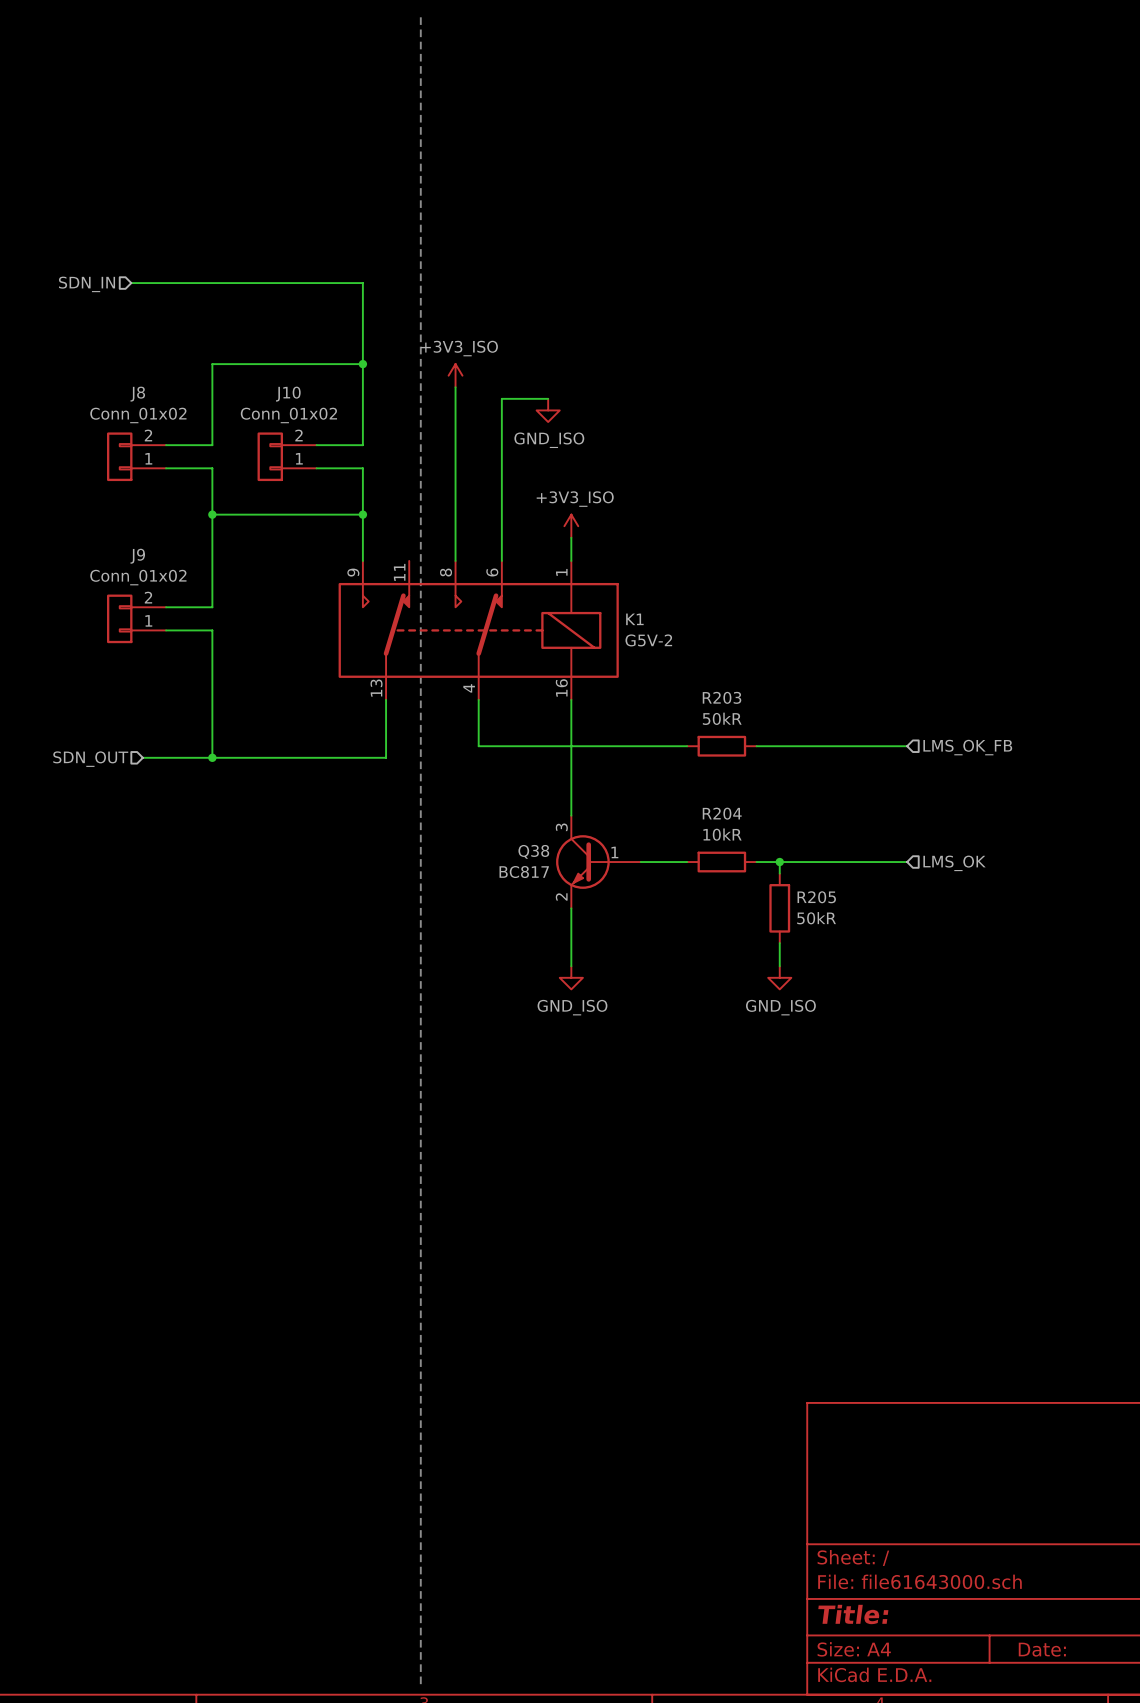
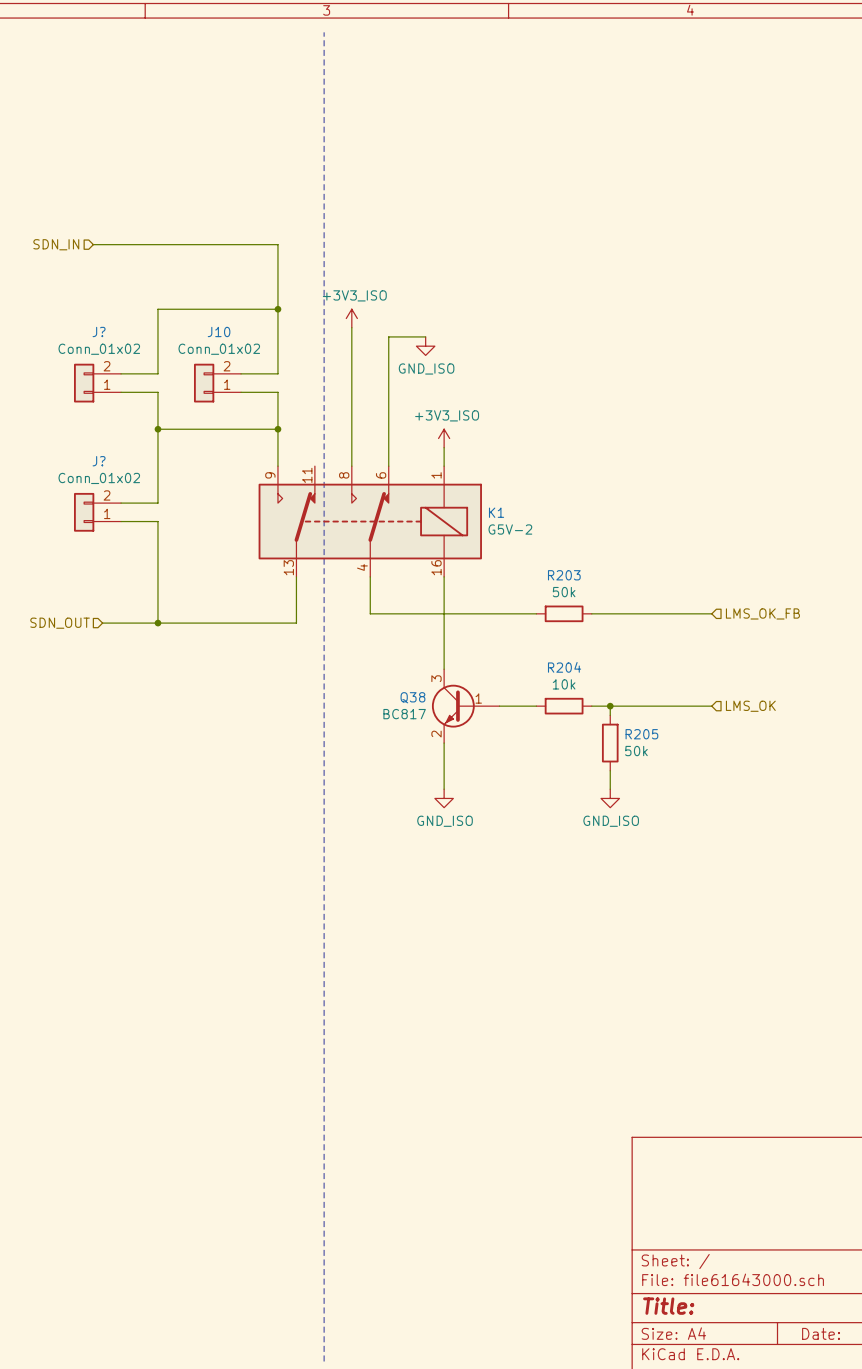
J8 name: J8 (137, 394) -> J? (99, 331)
J9 name: J9 (137, 556) -> J? (99, 461)
R203 value: 50kR (722, 718) -> 50k (564, 592)
R204 value: 10kR (722, 834) -> 10k (564, 684)
R205 value: 50kR (816, 918) -> 50k (636, 751)

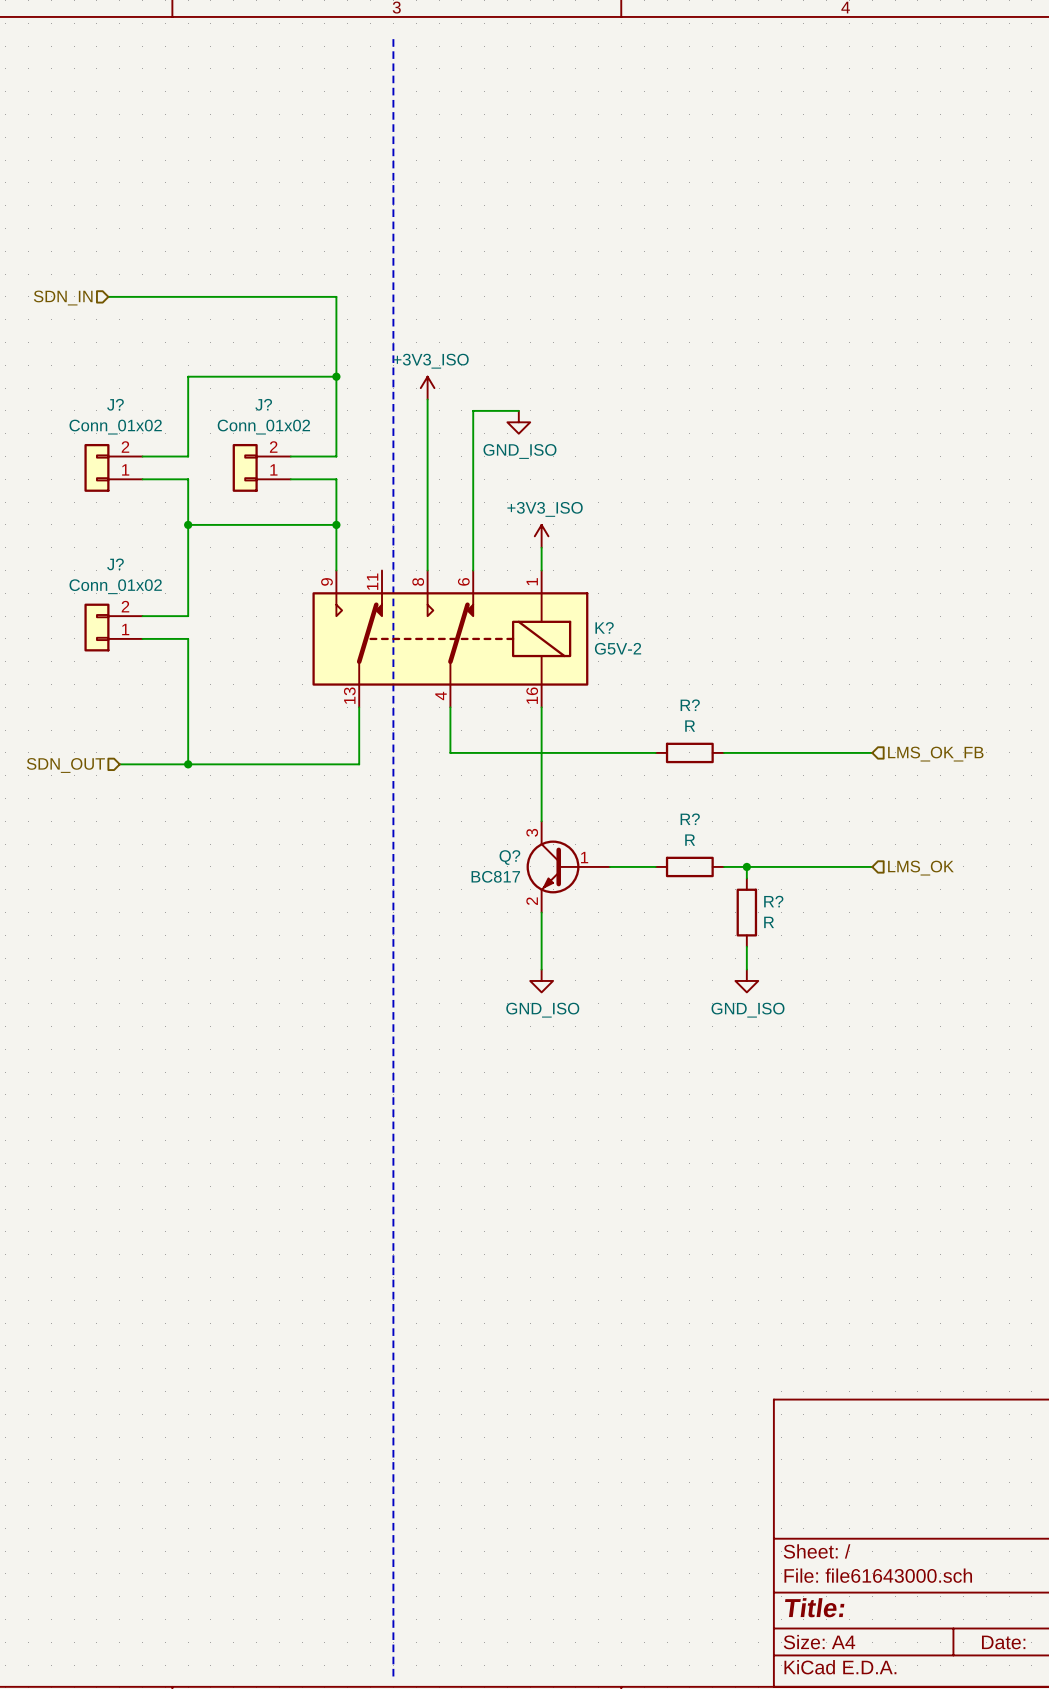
J10 name: J10 (219, 331) -> J? (263, 404)
K1 name: K1 (496, 512) -> K? (604, 627)
R203 name: R203 (564, 575) -> R? (690, 705)
R203 value: 50k (564, 592) -> R (690, 726)
R204 name: R204 (564, 667) -> R? (690, 819)
R204 value: 10k (564, 684) -> R (690, 840)
Q38 name: Q38 (412, 697) -> Q? (509, 857)
R205 name: R205 (641, 734) -> R? (773, 901)
R205 value: 50k (636, 751) -> R (769, 922)

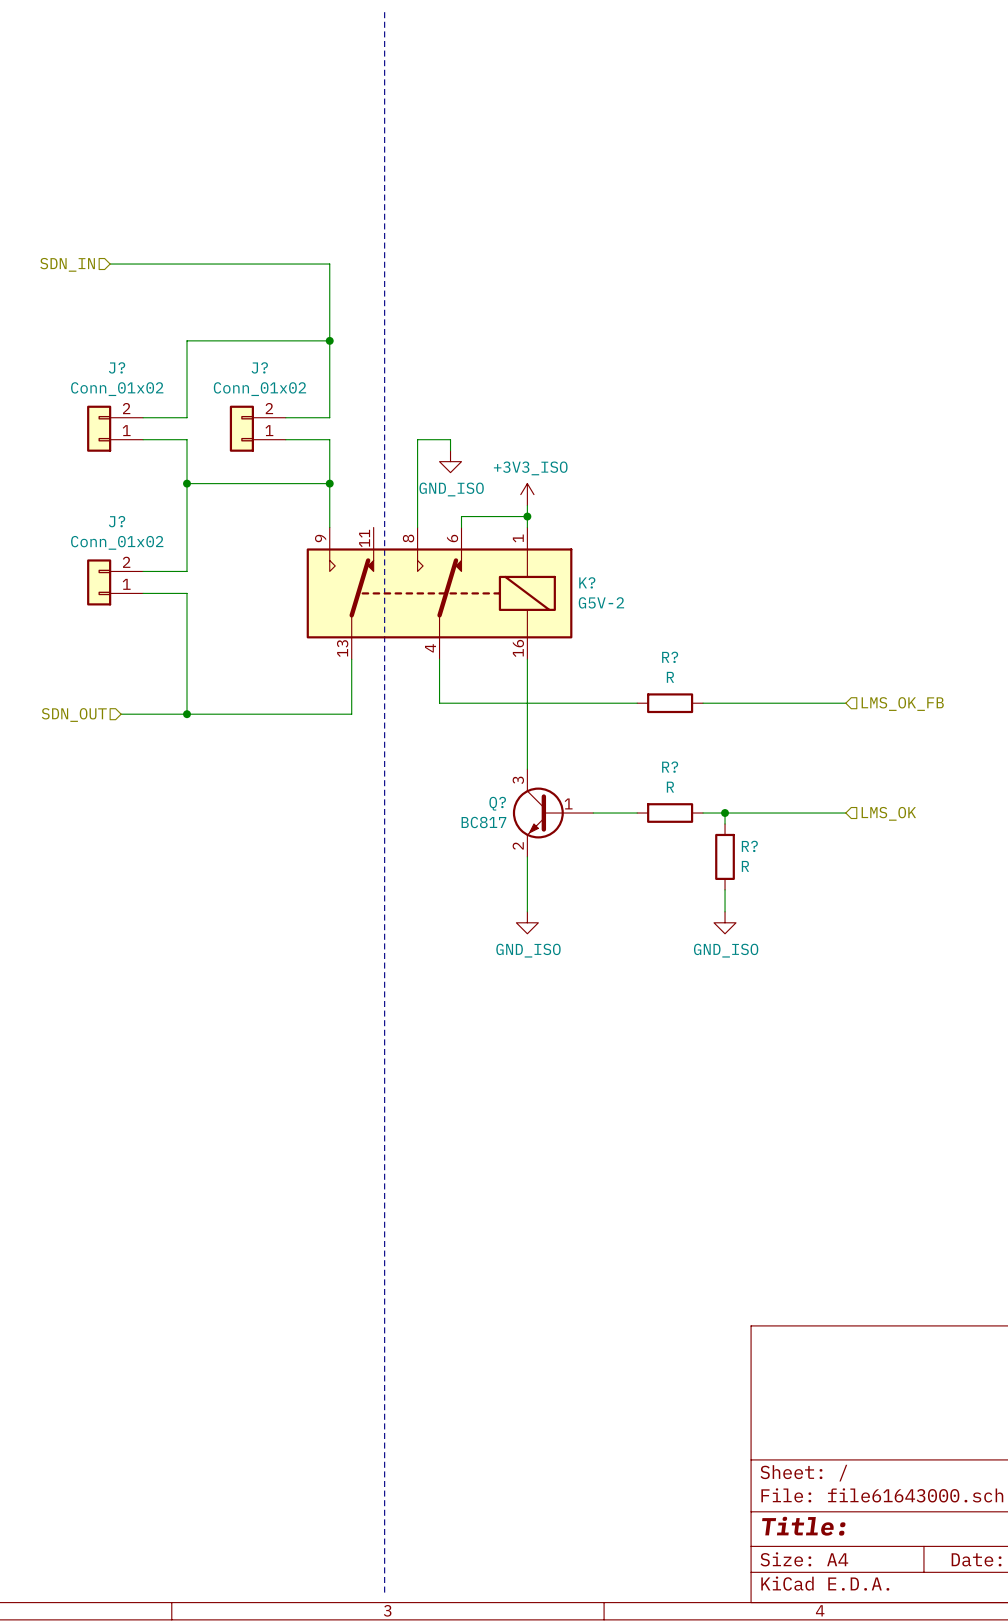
power symbol: +3V3_ISO (427, 388) -> none
wire: (427, 399) (427, 479) -> (450, 450) (450, 439) (417, 439)
wire: (518, 410) (473, 410) (473, 559) -> (527, 516) (461, 516)
power symbol position: GND_ISO (518, 422) -> GND_ISO (450, 461)
junction: none -> (527, 516)

